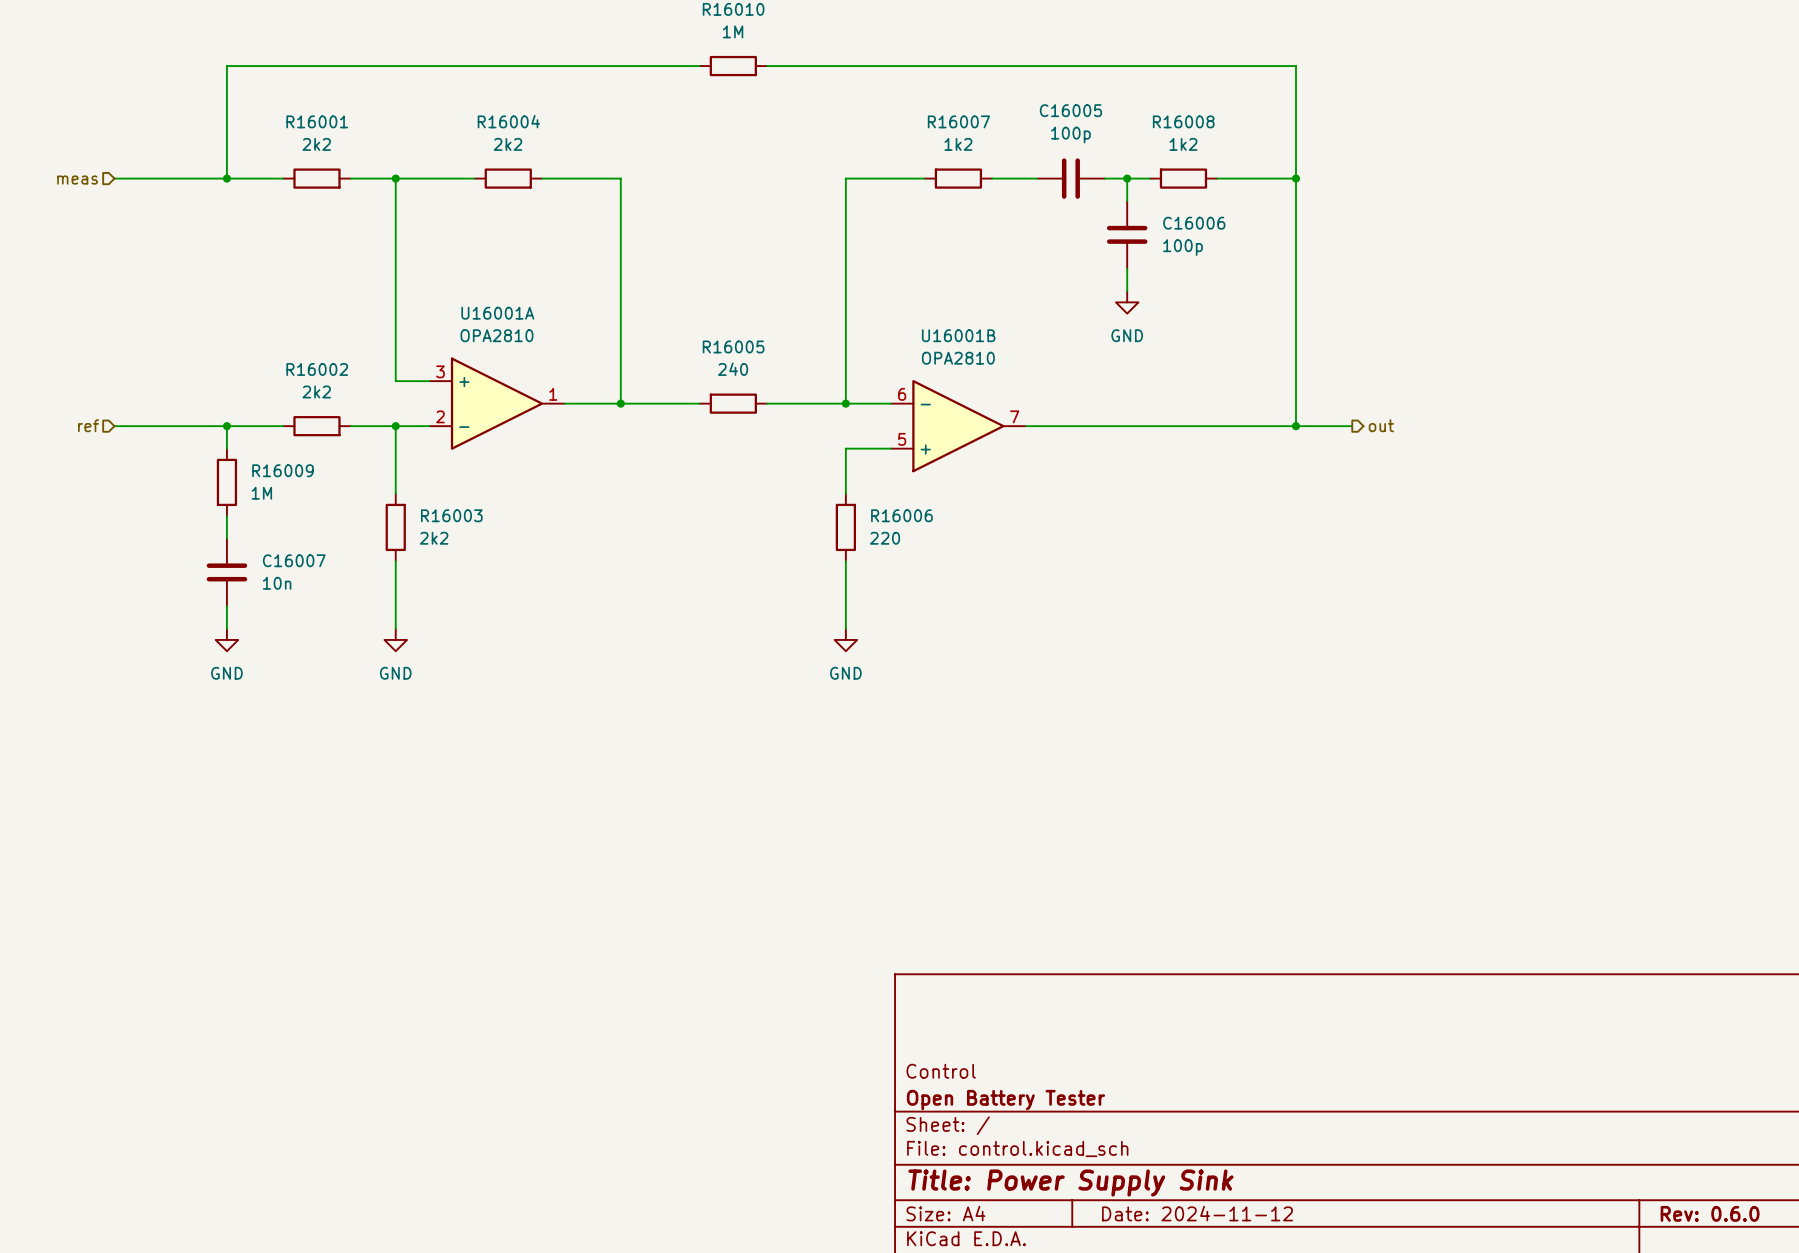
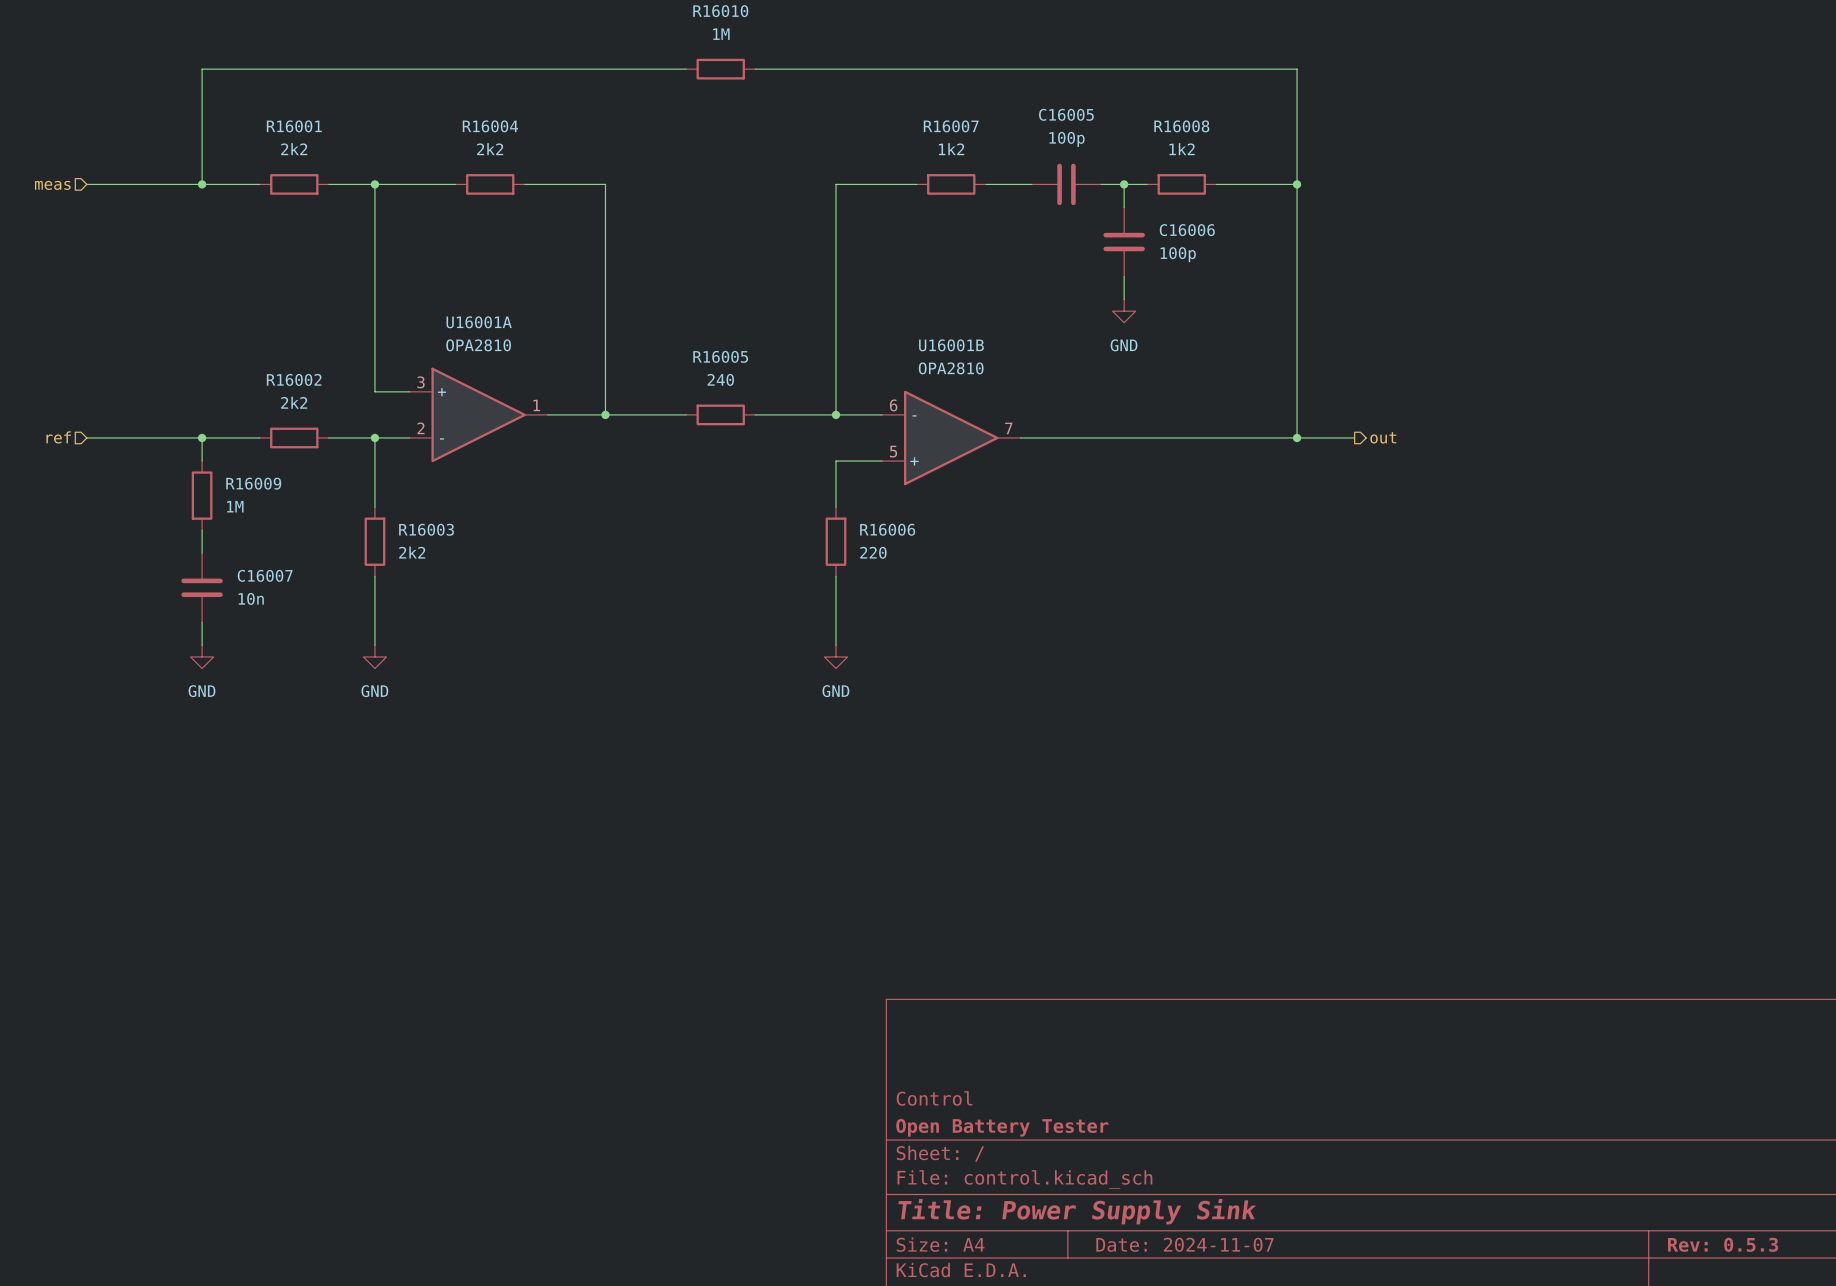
title block: Date: 2024-11-12 (1197, 1213) -> Date: 2024-11-07 (1184, 1244)
title block: Rev: 0.6.0 (1710, 1213) -> Rev: 0.5.3 (1723, 1244)

